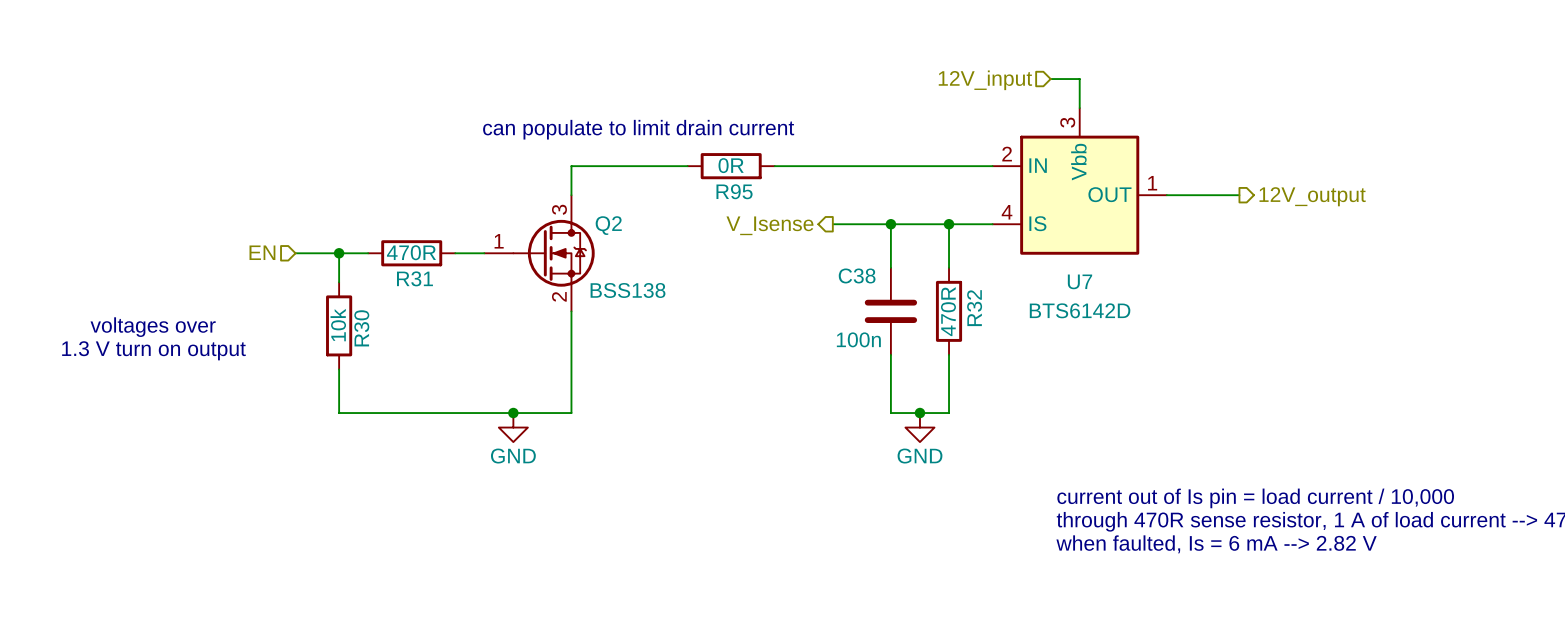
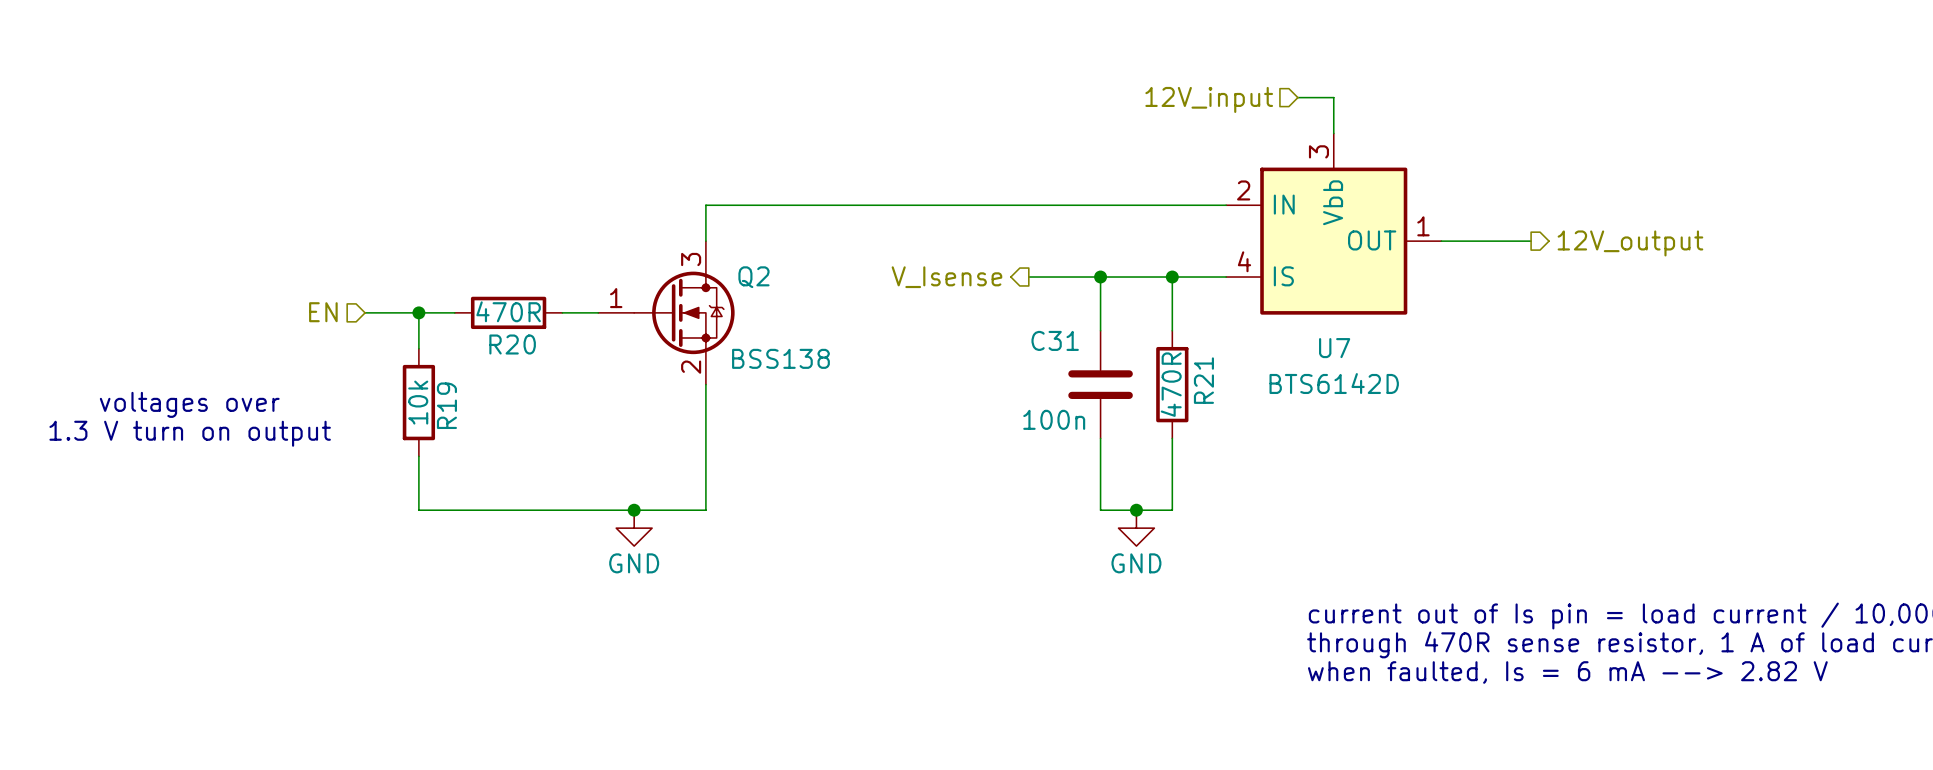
text: can populate to limit drain current (638, 129) -> none
wire: none -> (849, 205) (957, 205)
R95: 0R (731, 166) -> none
C38 name: C38 (857, 275) -> C31 (1055, 340)
R31 name: R31 (414, 278) -> R20 (512, 344)
R32 name: R32 (974, 308) -> R21 (1203, 380)
R30 name: R30 (361, 328) -> R19 (446, 405)

